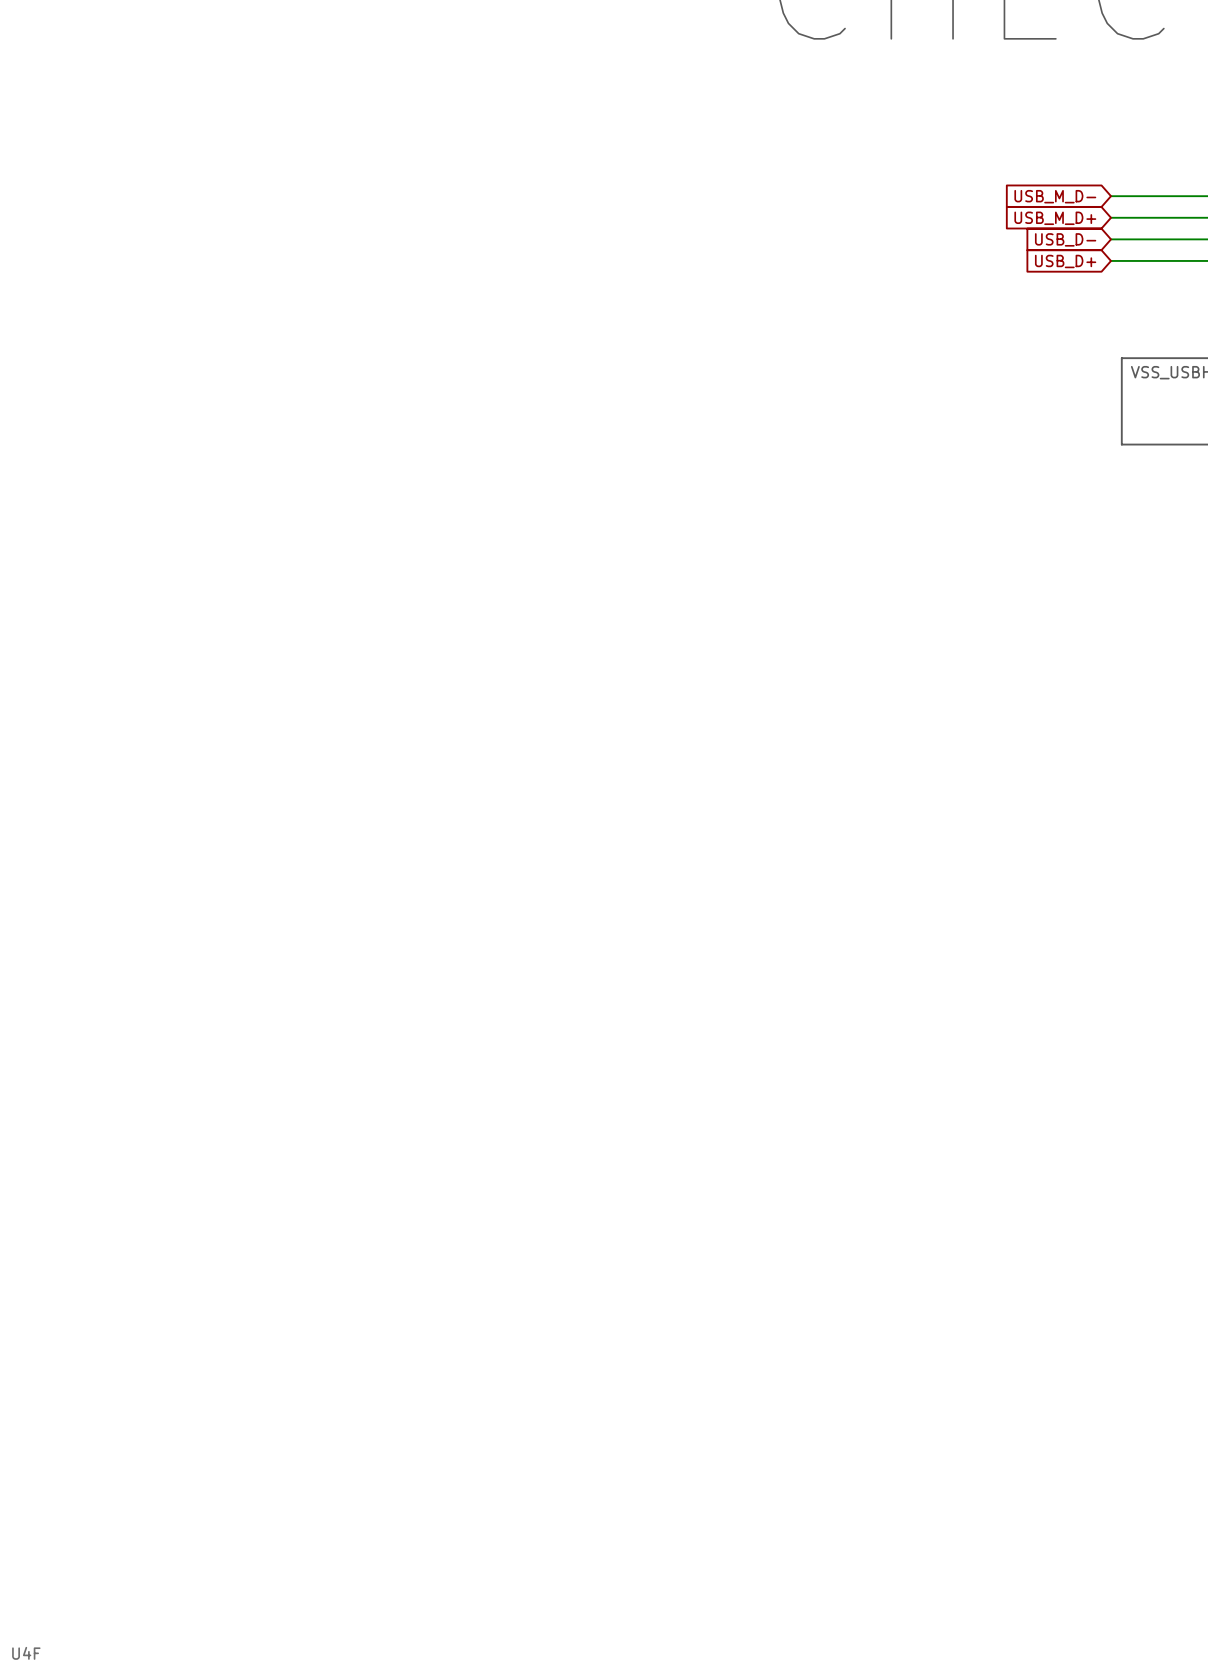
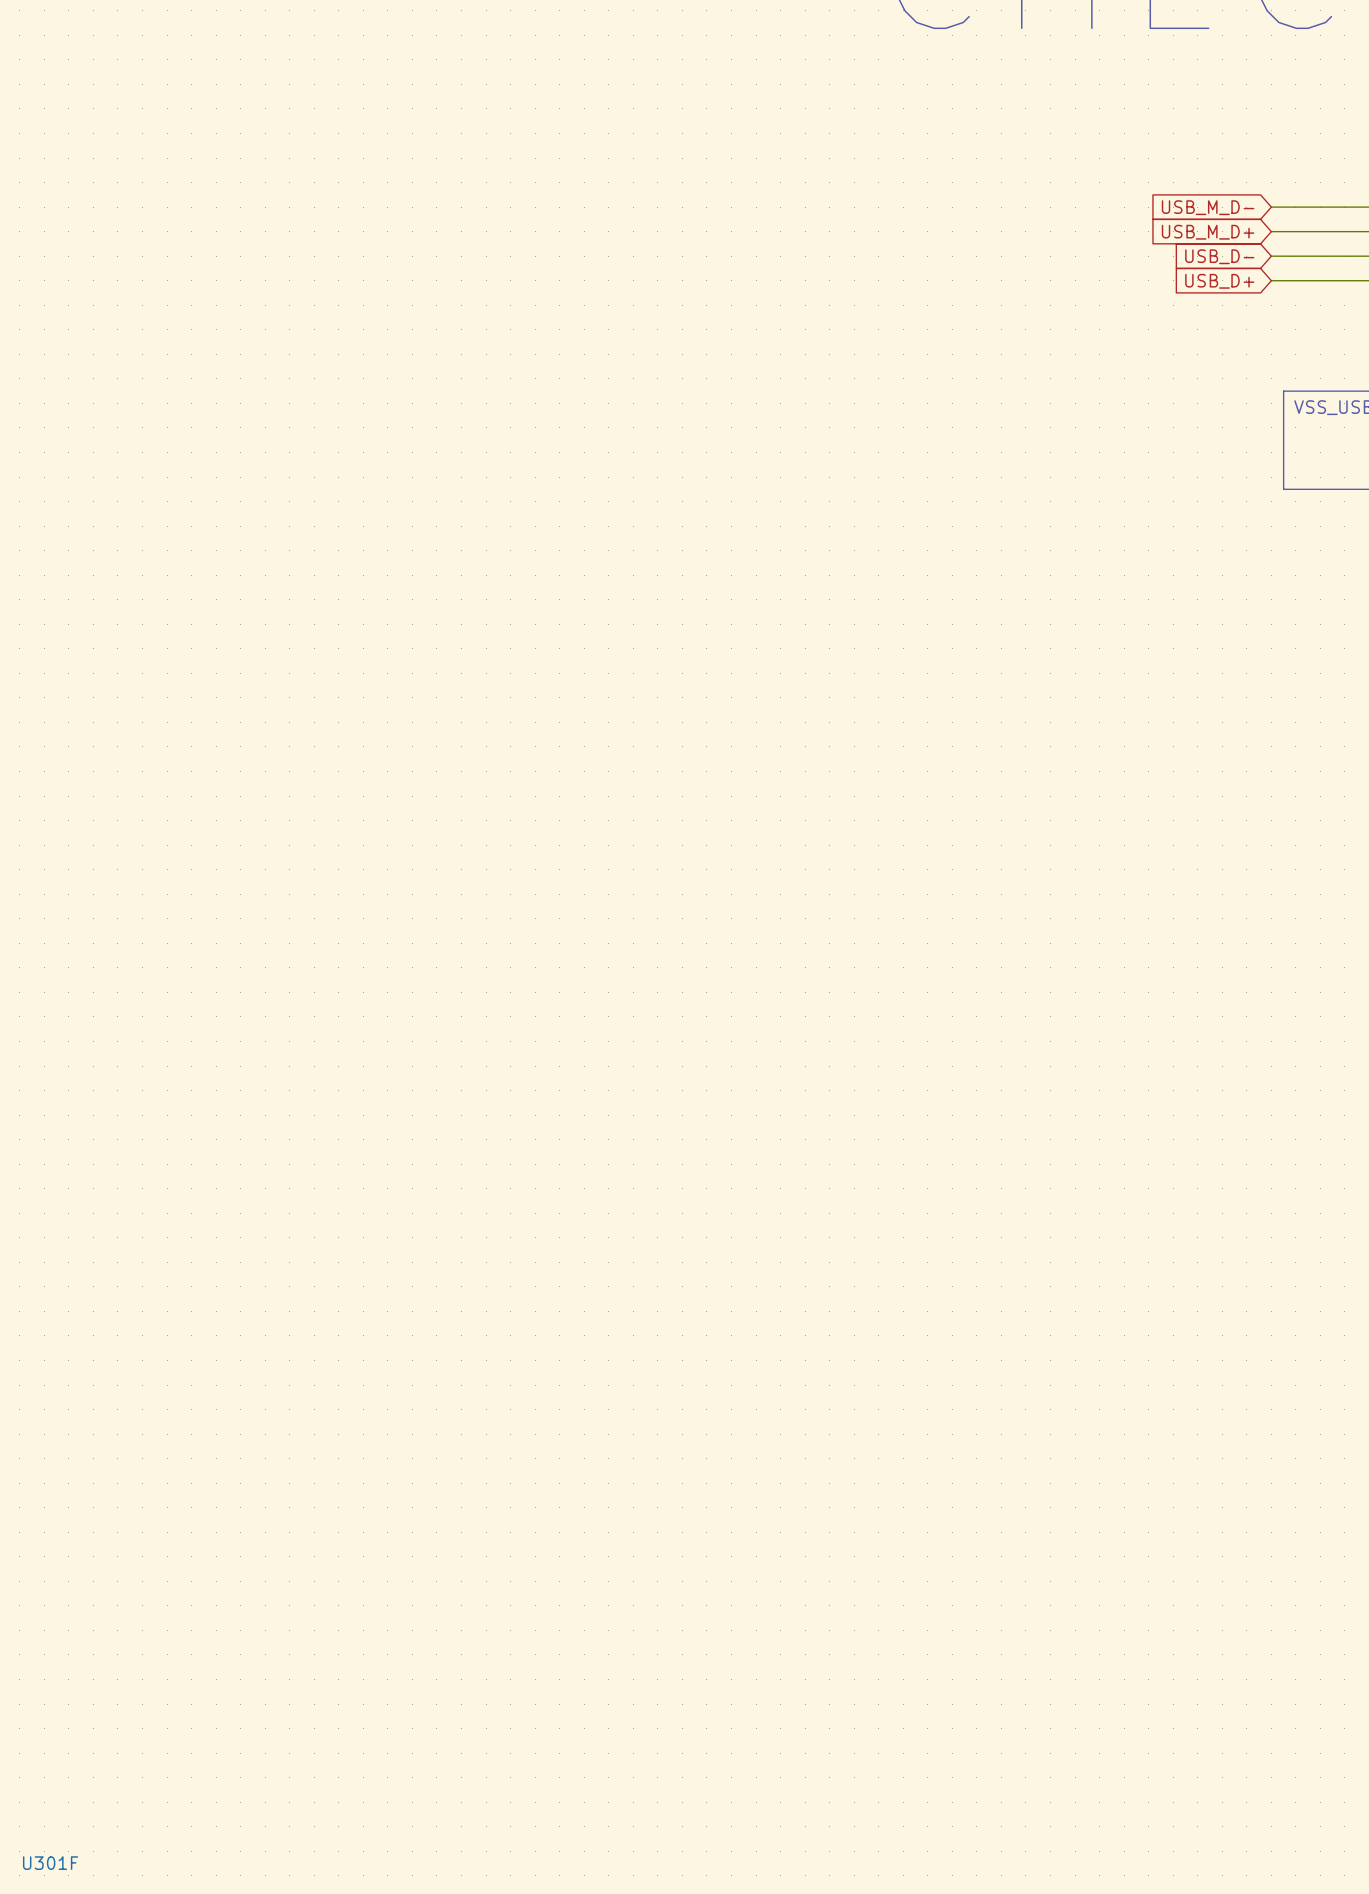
U4F name: U4F (26, 1653) -> U301F (50, 1863)

